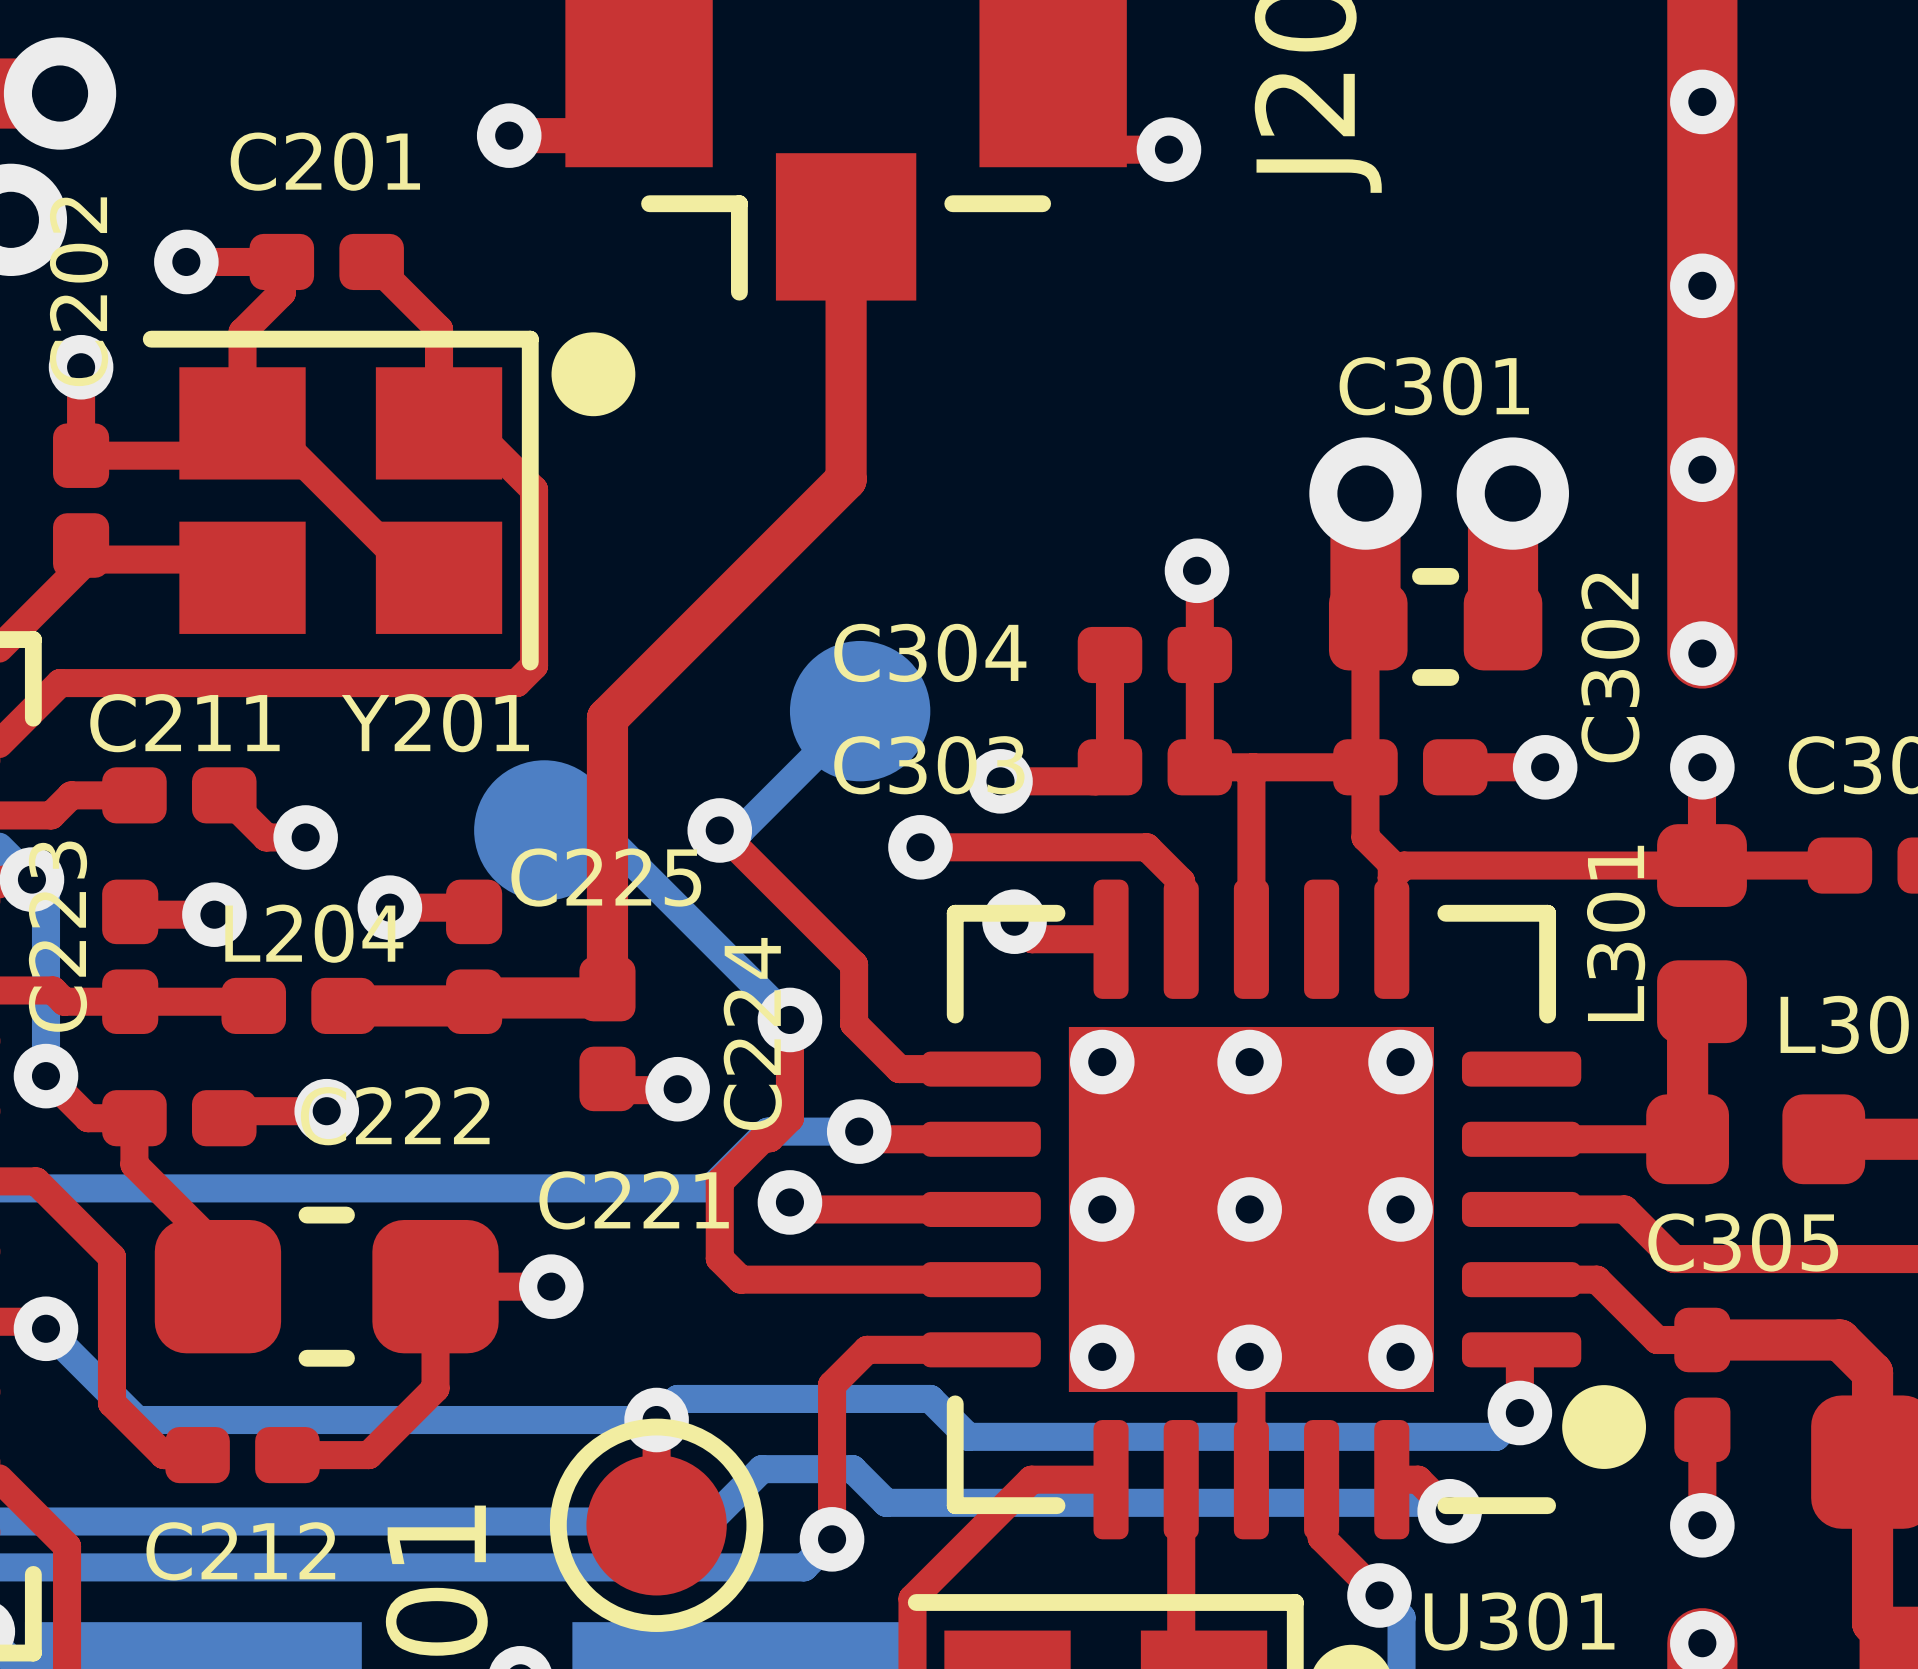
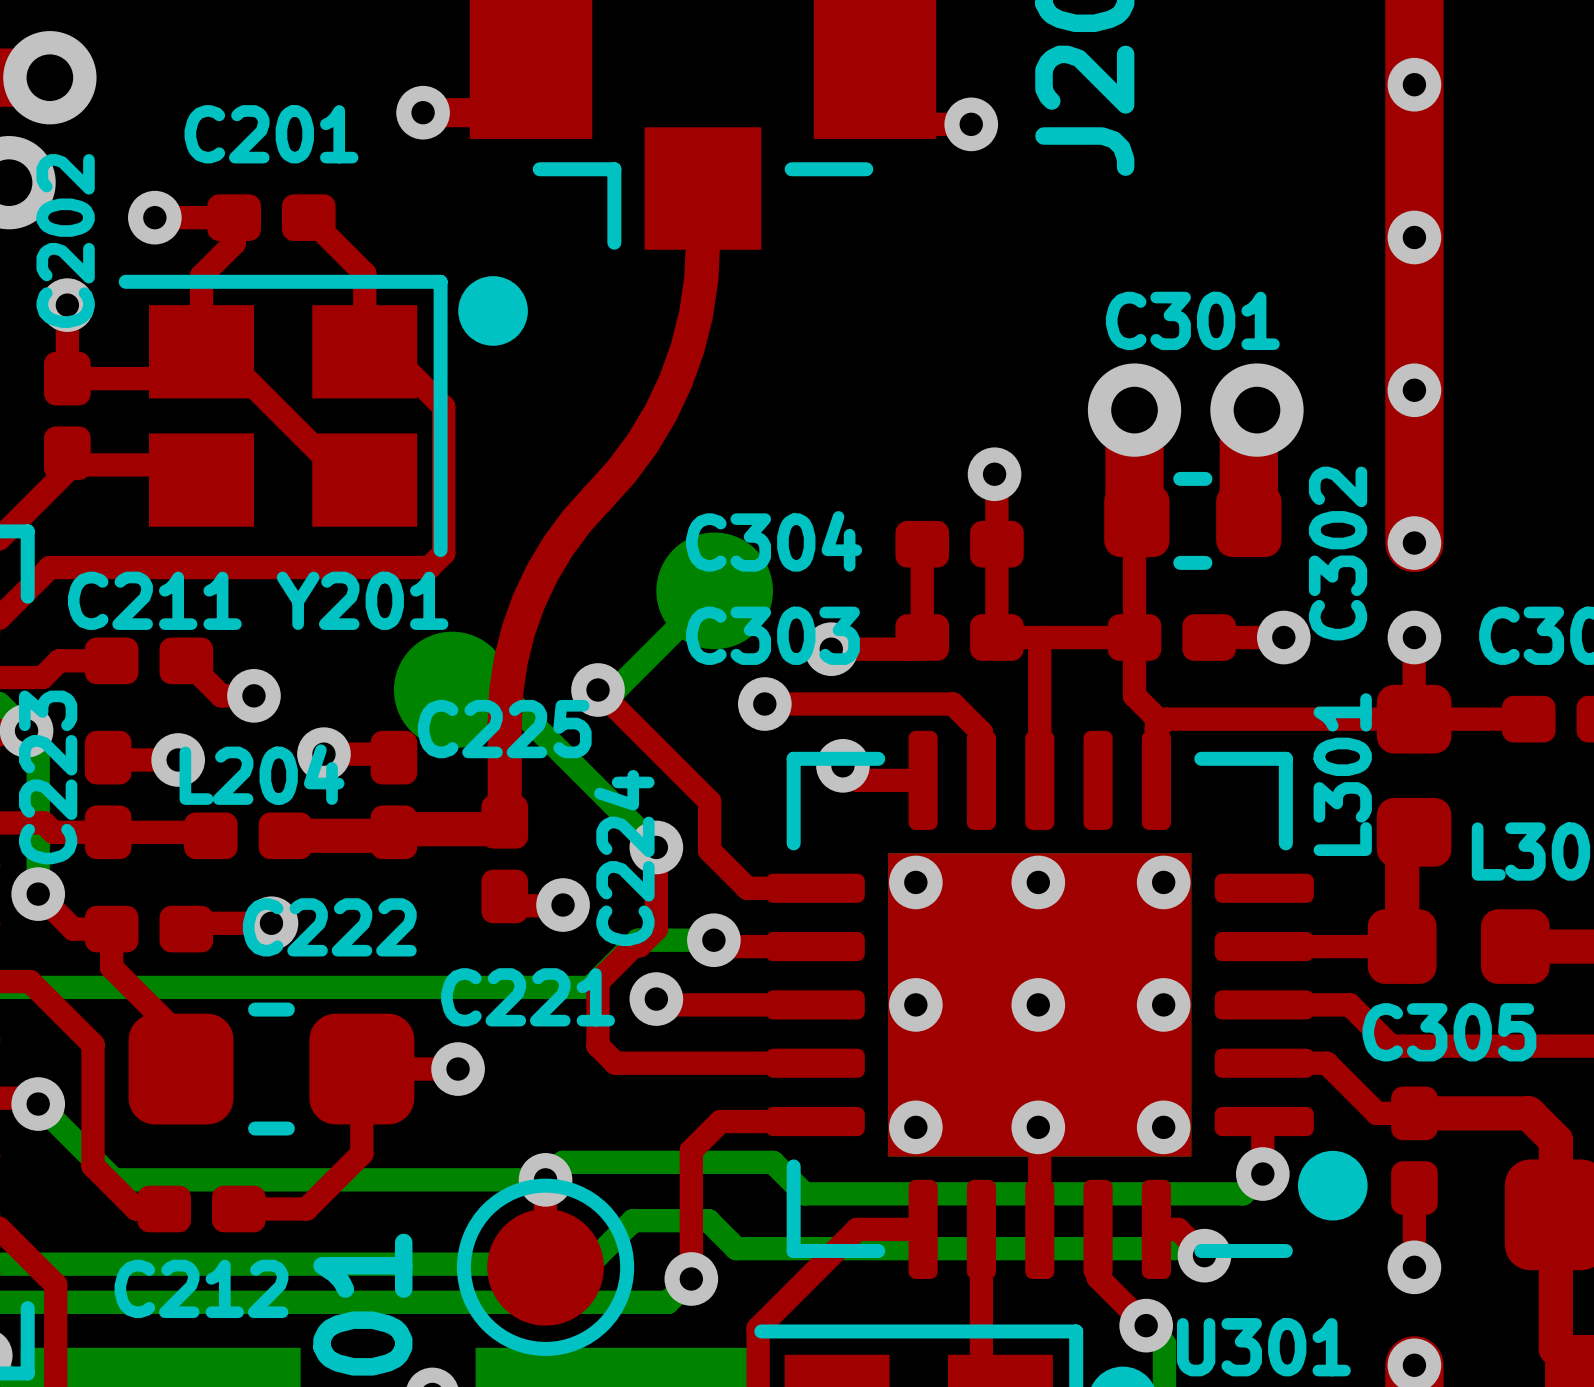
top track: (846, 293) (846, 479) (607, 718) (607, 869) -> (703, 244) (701, 279) (696, 314) (687, 348) (675, 381) (660, 413) (642, 443) (621, 471) (577, 520) (558, 545) (542, 572) (528, 600) (518, 630) (510, 660) (506, 691) (504, 722)

